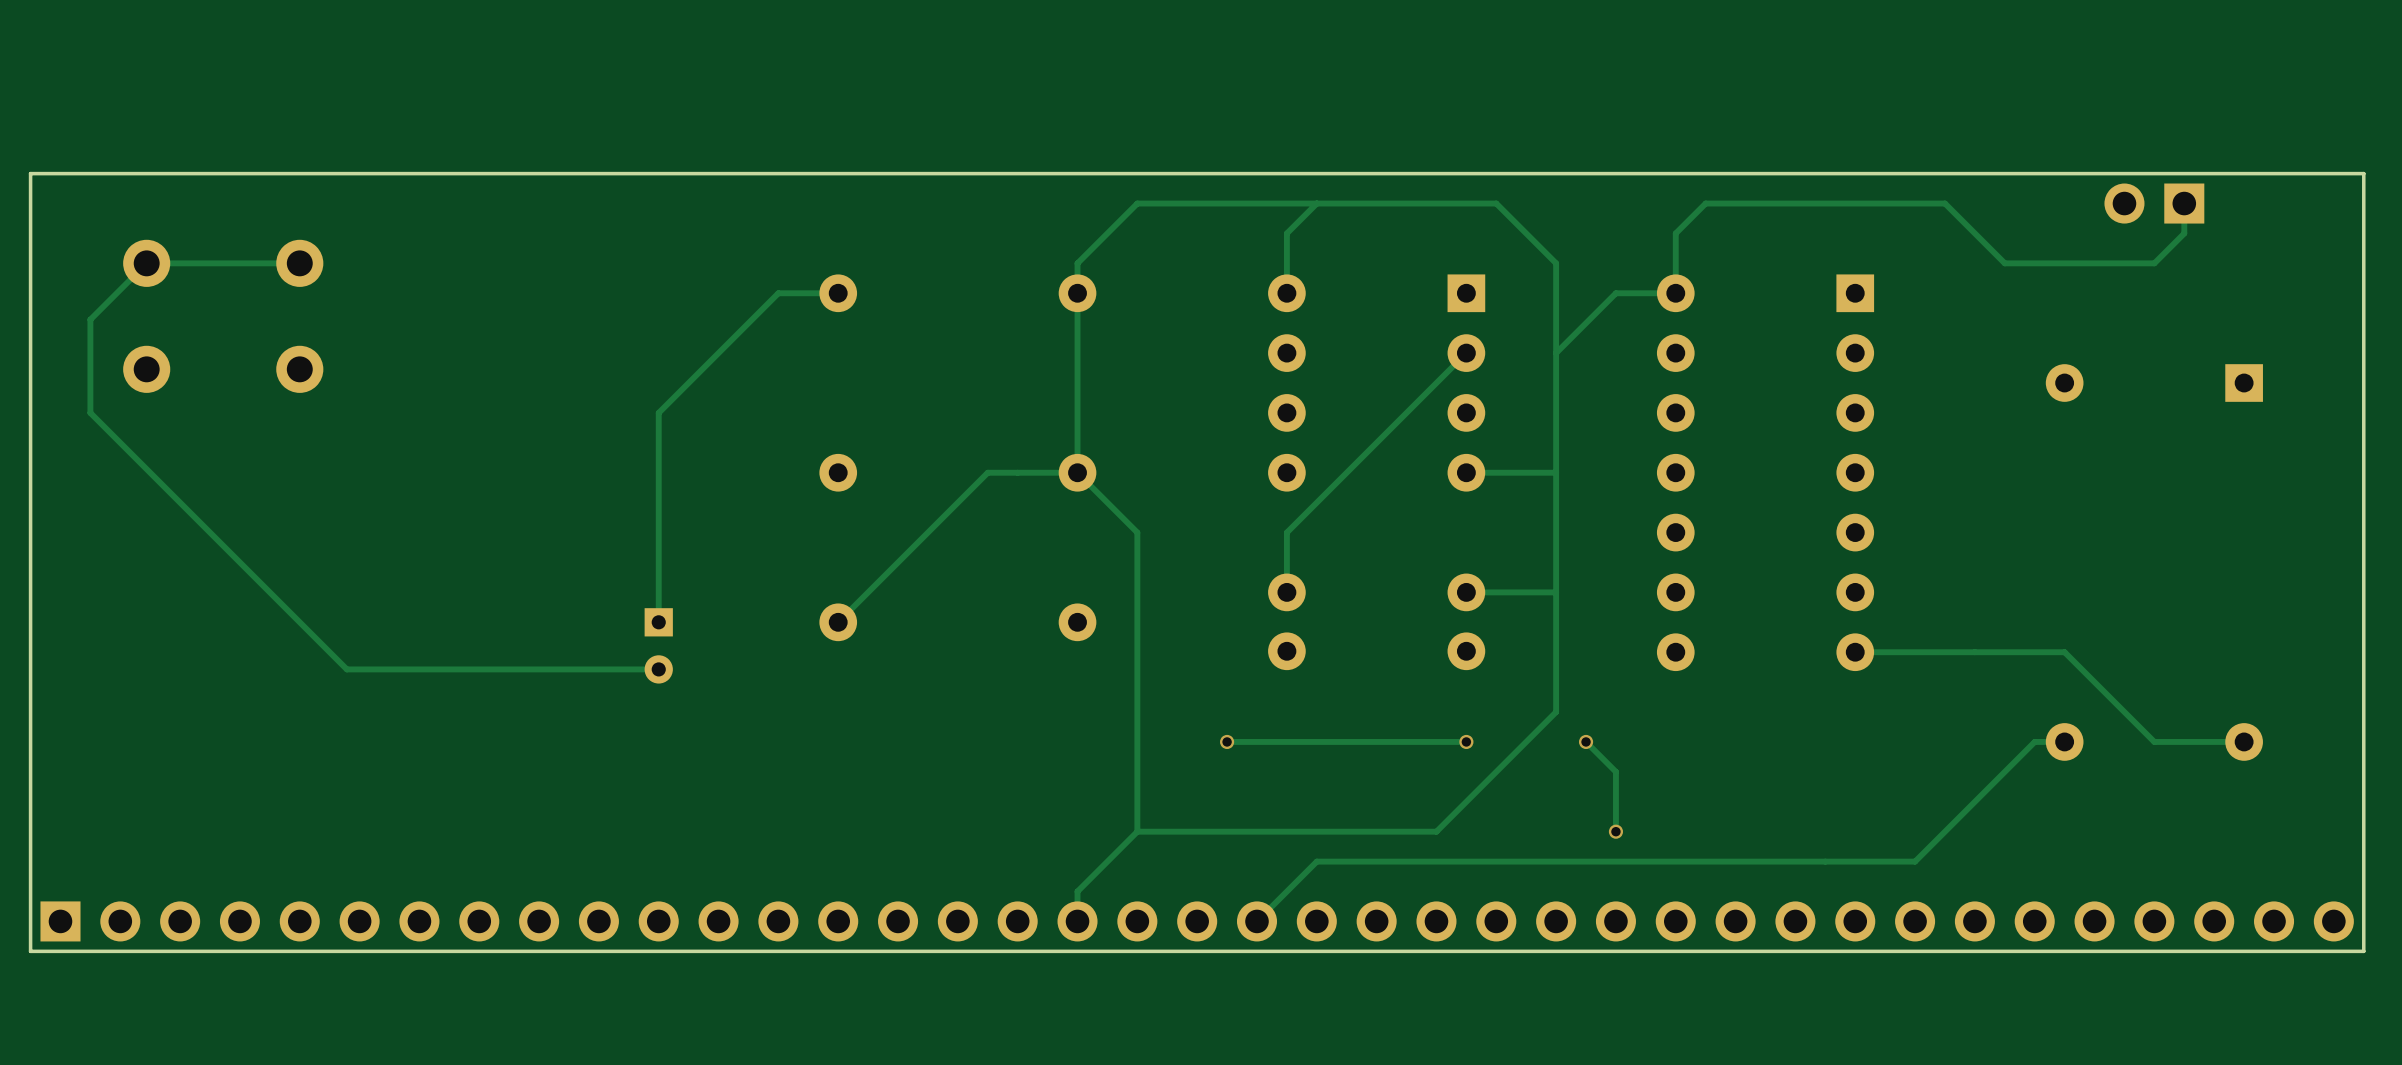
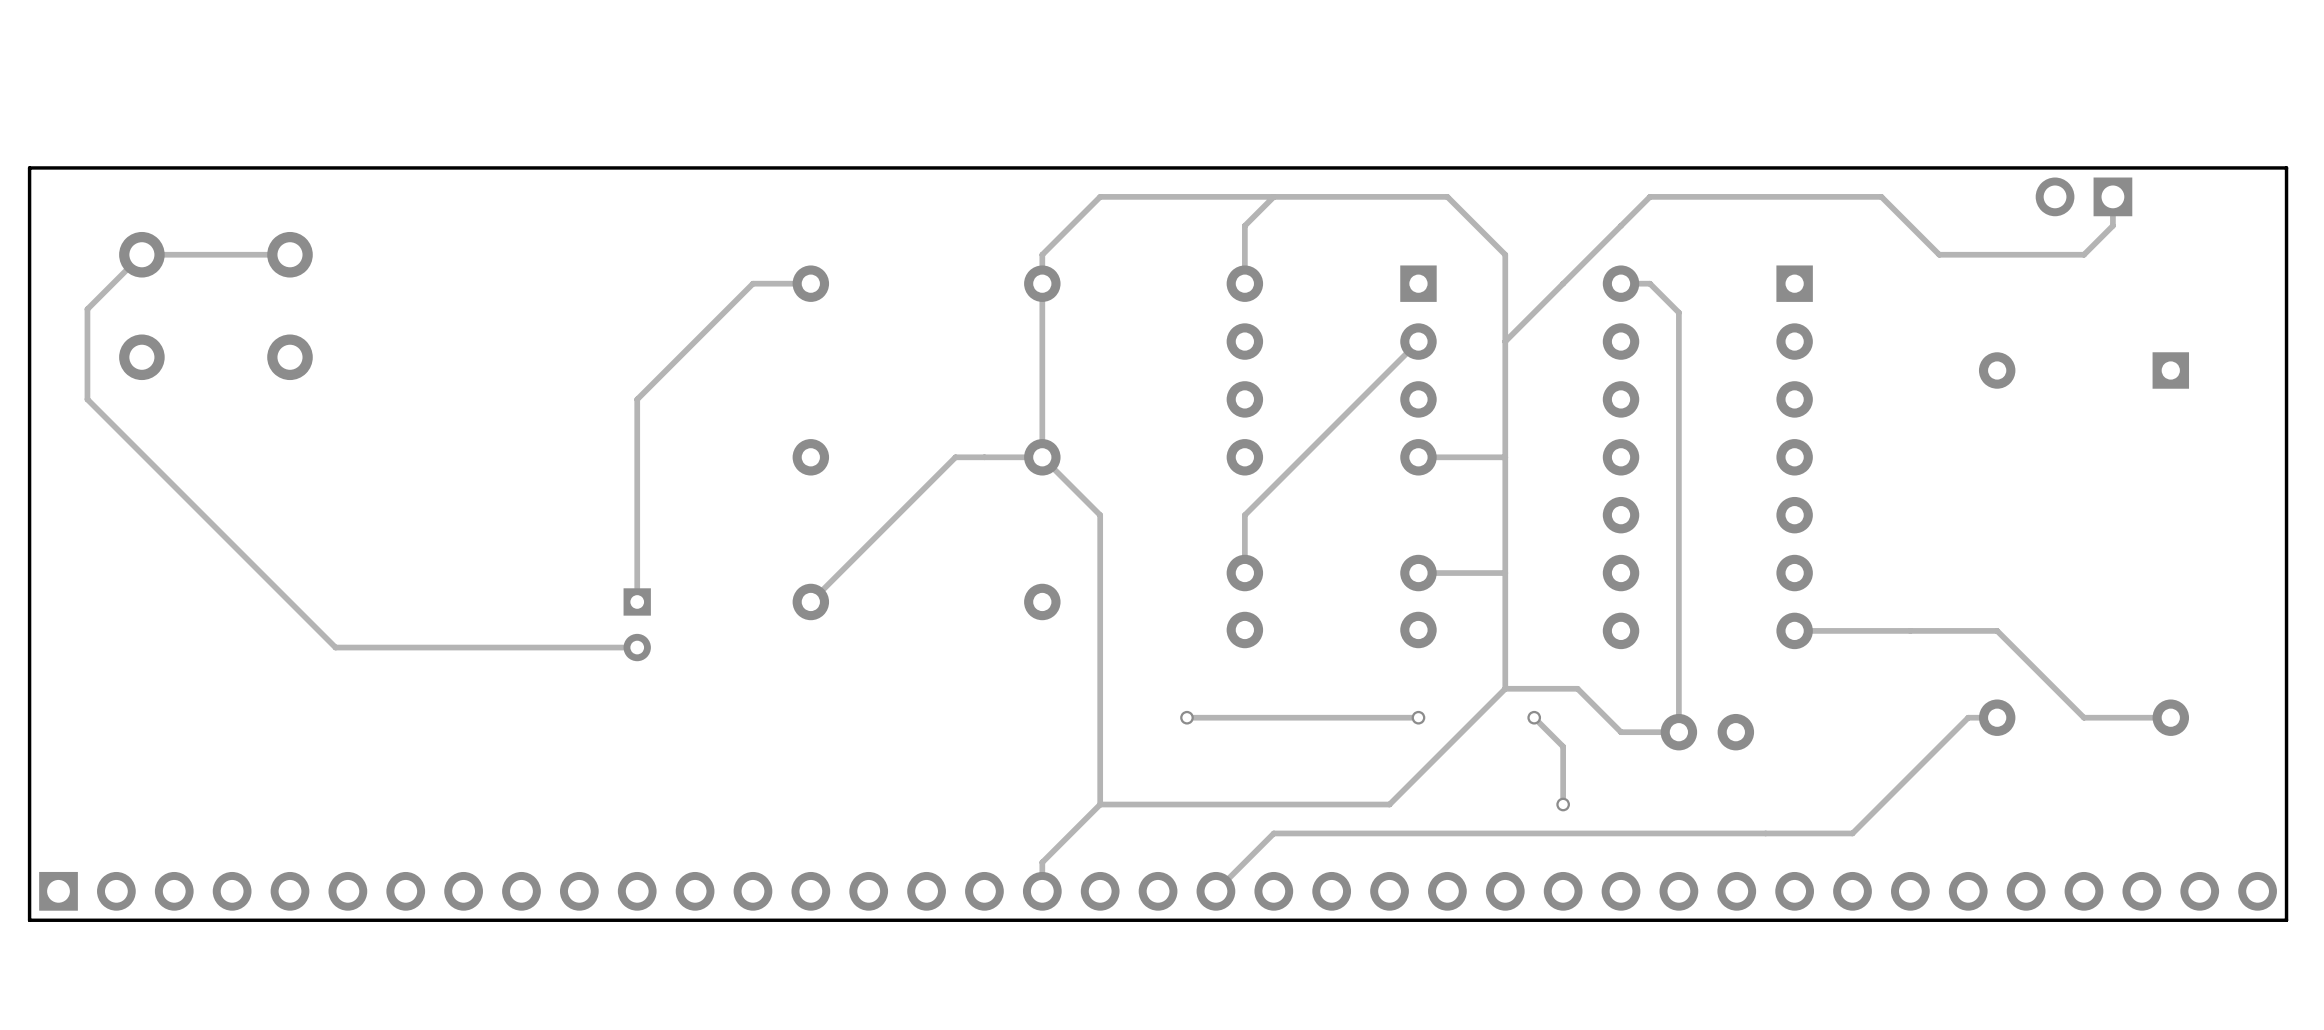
track: (1675, 233) (1675, 293) (1615, 293) -> (1621, 225) (1563, 283)
track: none -> (1621, 283) (1649, 283) (1678, 312) (1678, 732) (1621, 732) (1577, 688) (1505, 688)
part: none -> (1707, 732)

